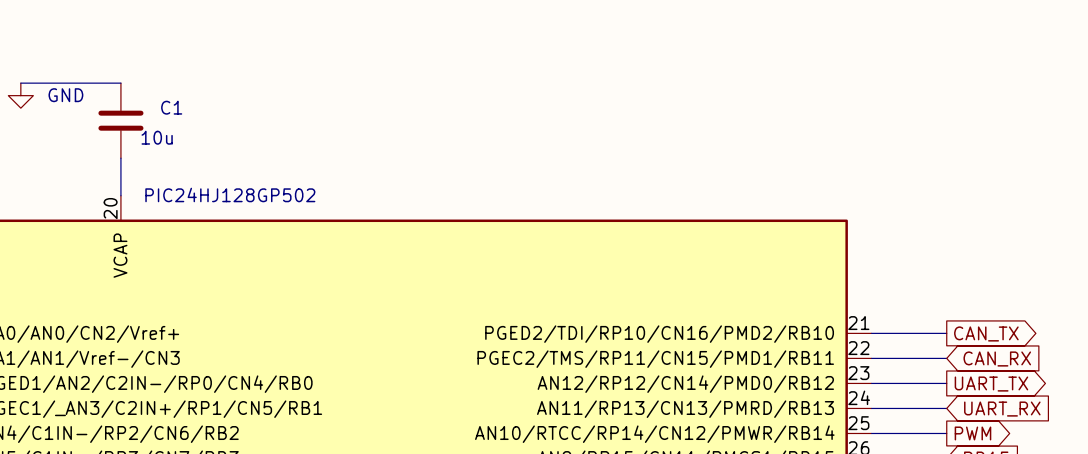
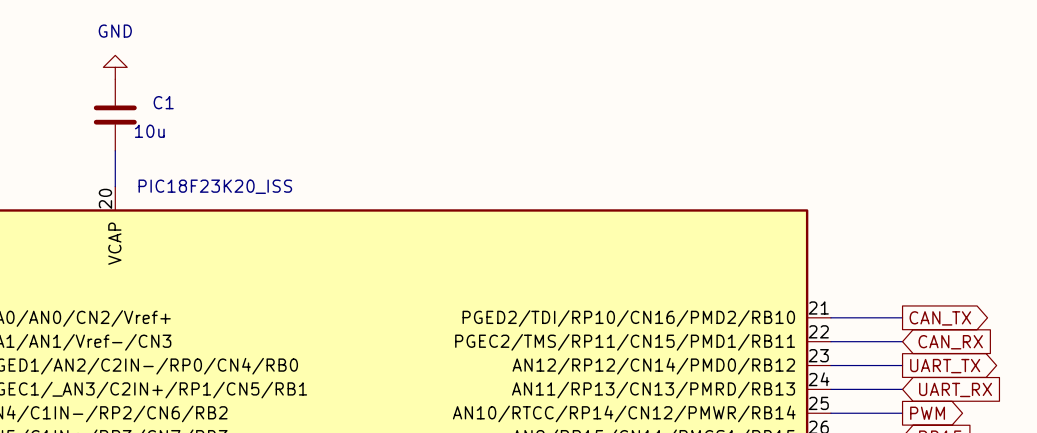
wire: (20, 83) (120, 83) -> none
power symbol rotation: 0° (20, 95) -> 180° (115, 67)
power symbol position: GND (20, 95) -> GND (115, 67)
power symbol text position: GND (65, 95) -> GND (115, 31)
part value: PIC24HJ128GP502 (230, 194) -> PIC18F23K20_ISS (215, 186)

